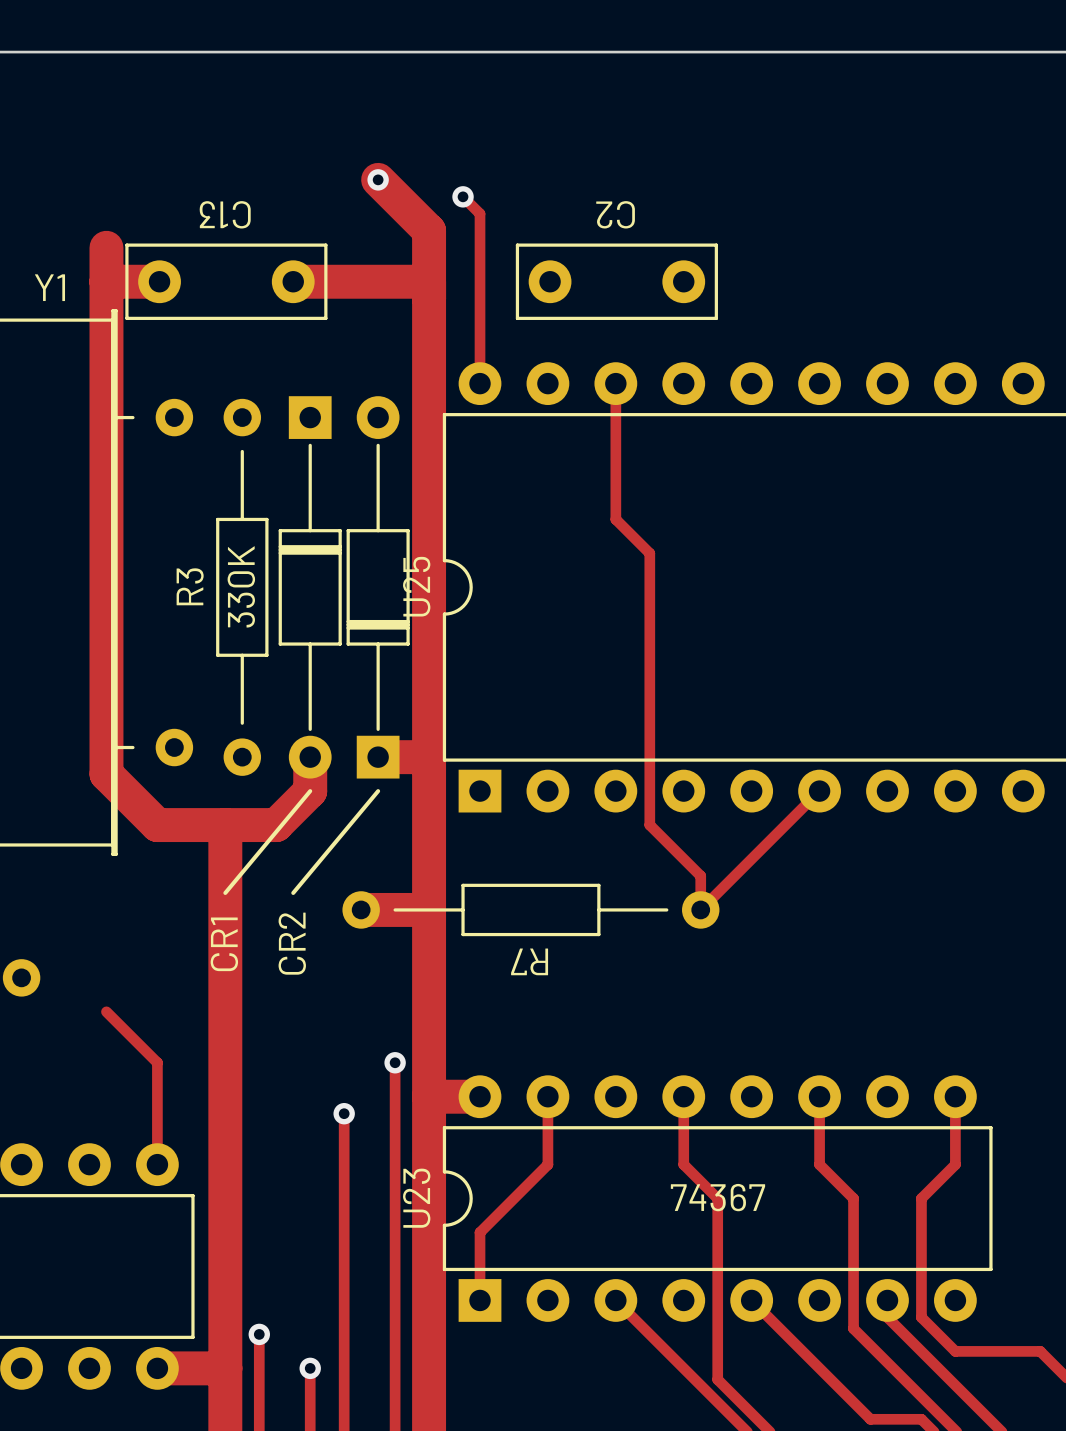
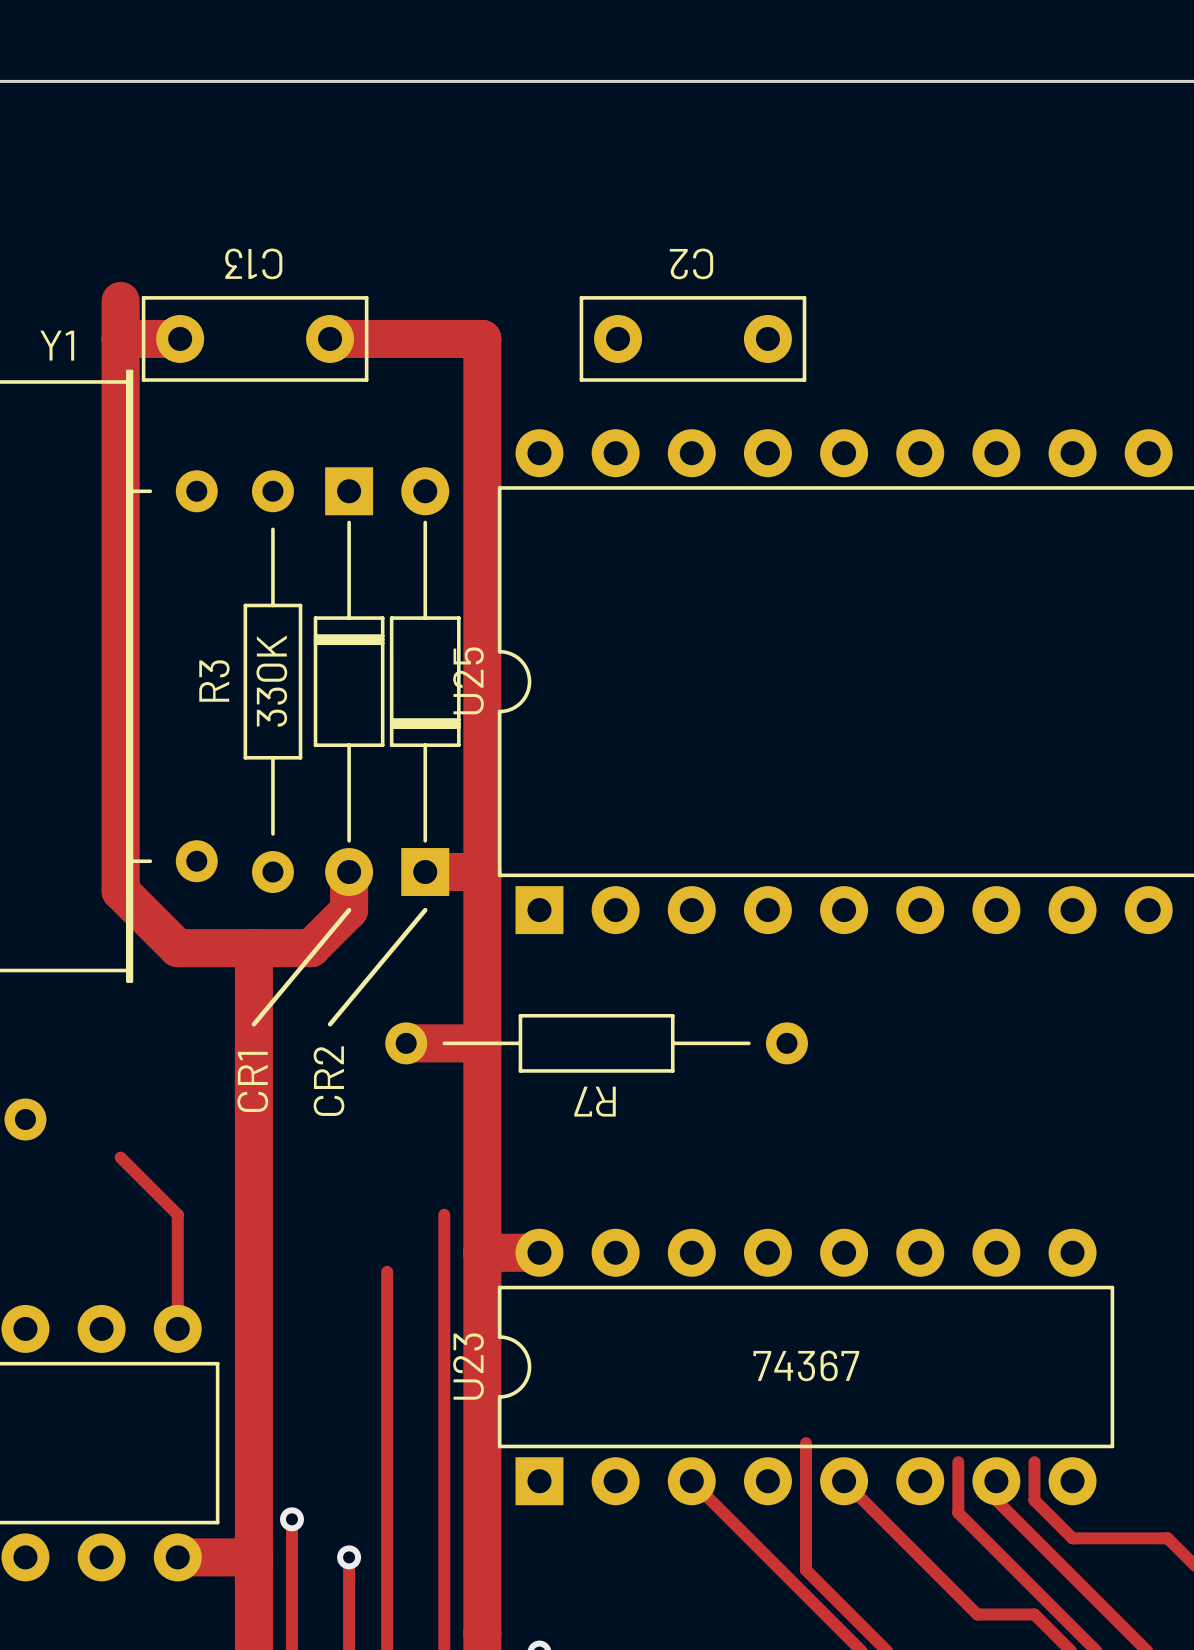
track: (378, 179) (429, 230) (429, 281) -> none
via: (378, 179) -> none
track: (463, 196) (480, 213) (480, 383) -> none
via: (463, 196) -> none
track: (615, 383) (615, 519) (649, 553) (649, 825) (700, 875) (700, 909) (819, 791) -> none
via: (395, 1062) -> none
track: (547, 1096) (547, 1164) (480, 1232) (480, 1300) -> none
track: (683, 1096) (683, 1164) (717, 1198) (717, 1266) -> none
track: (819, 1096) (819, 1164) (853, 1198) (853, 1283) -> none
track: (955, 1096) (955, 1164) (921, 1198) (921, 1283) -> none
via: (344, 1113) -> none

